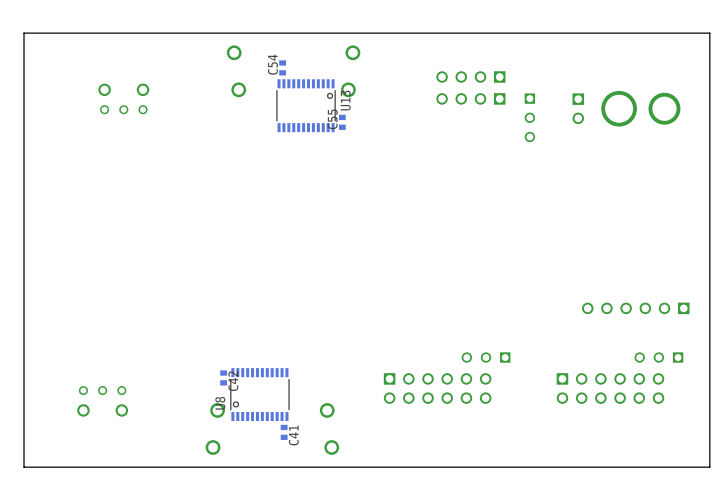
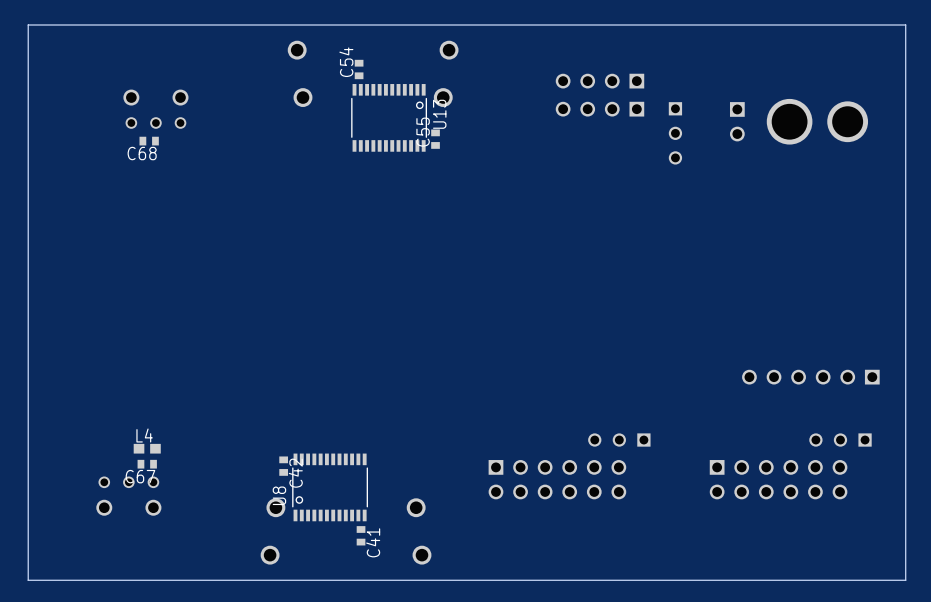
C68: none -> (149, 141)
L4: none -> (147, 448)
C67: none -> (147, 464)

